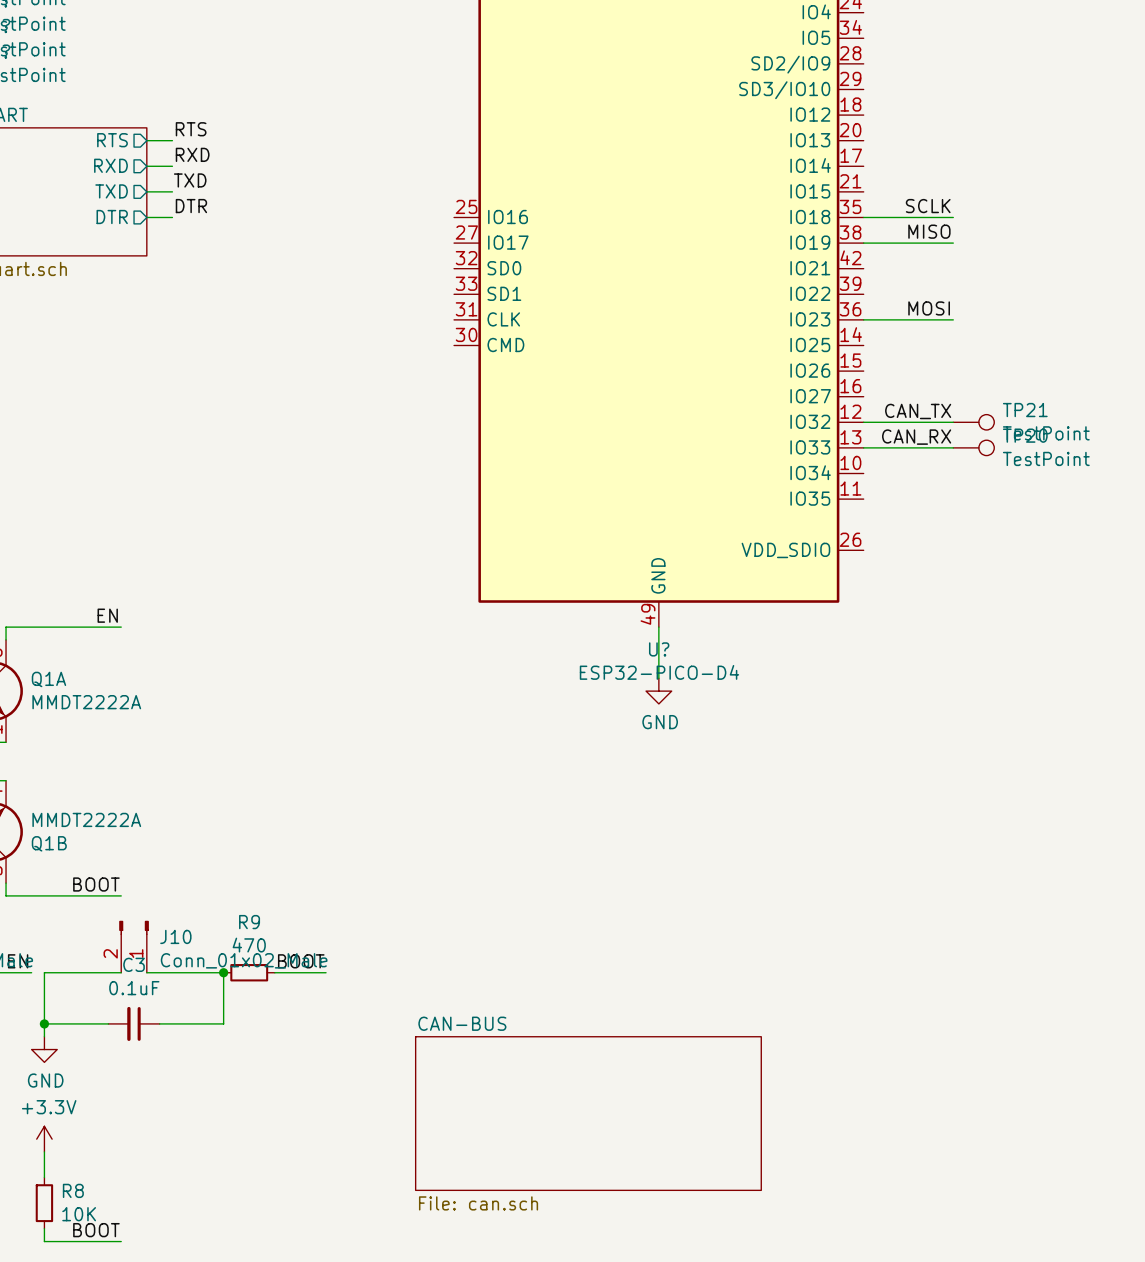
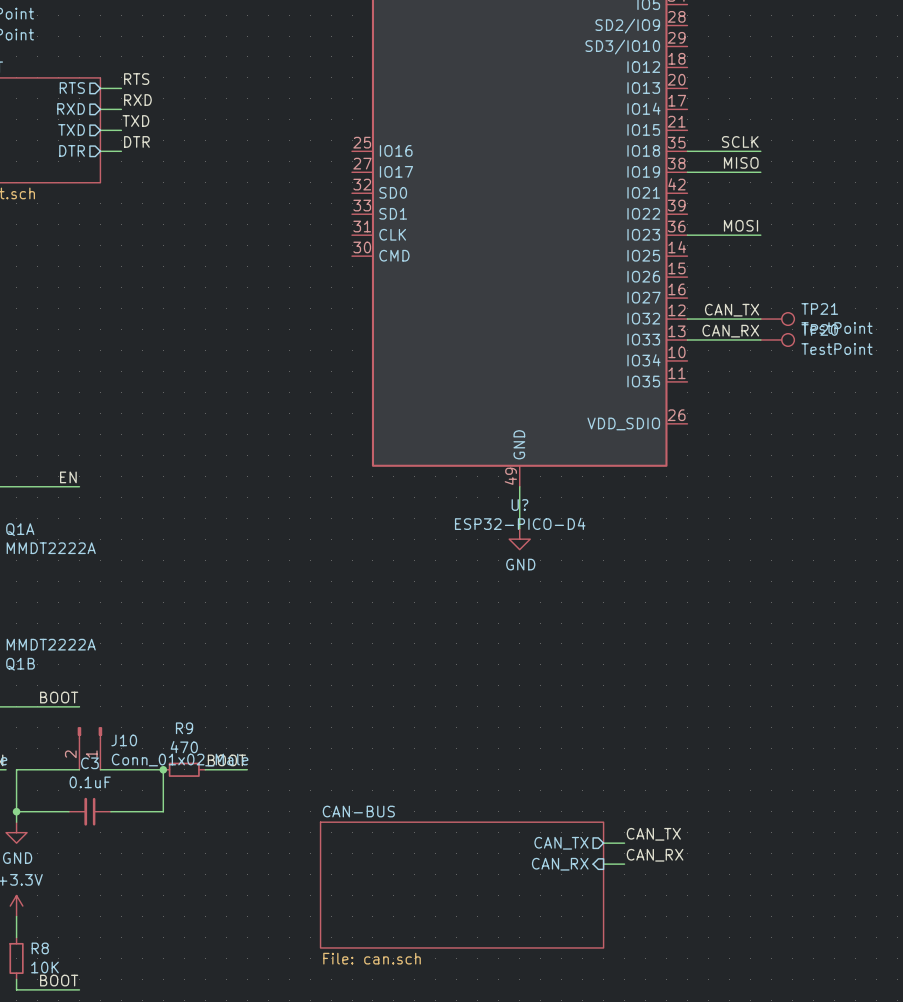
label: none -> CAN_TX (653, 834)
sheet pin: none -> CAN_TX (561, 843)
wire: none -> (603, 843) (624, 843)
label: none -> CAN_RX (655, 855)
wire: none -> (603, 864) (624, 864)
sheet pin: none -> CAN_RX (560, 864)

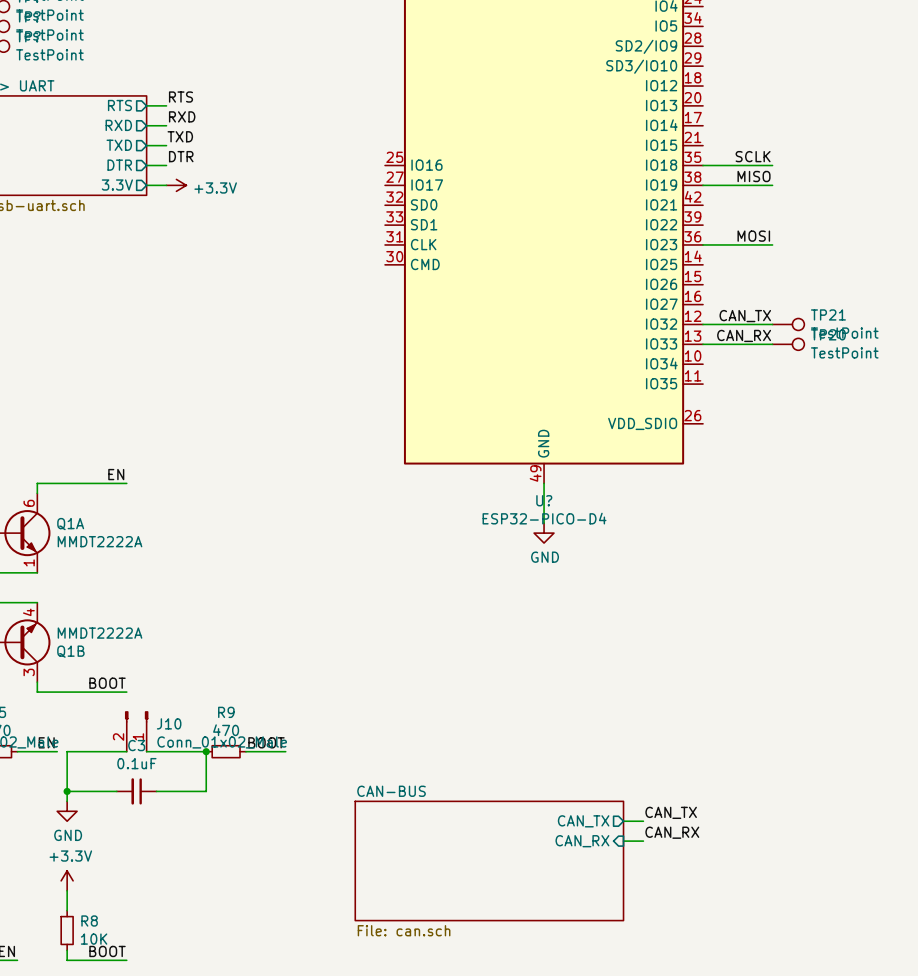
sheet pin: none -> 3.3V (117, 185)
wire: none -> (146, 185) (166, 185)
power symbol: none -> +3.3V (176, 185)

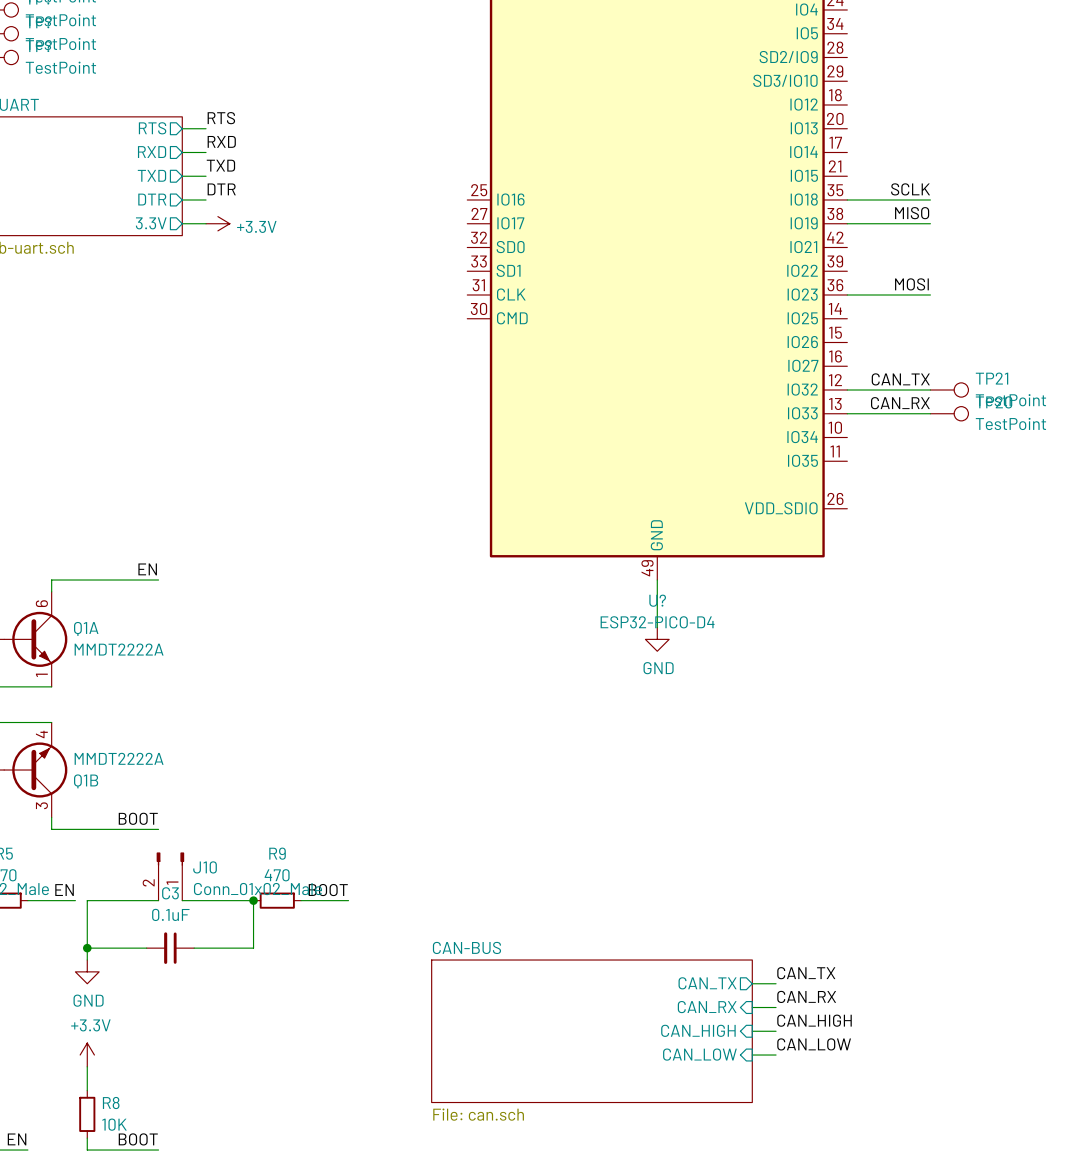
label: none -> CAN_HIGH (814, 1020)
wire: none -> (752, 1031) (776, 1031)
sheet pin: none -> CAN_HIGH (698, 1030)
label: none -> CAN_LOW (814, 1044)
sheet pin: none -> CAN_LOW (699, 1054)
wire: none -> (752, 1055) (776, 1055)

